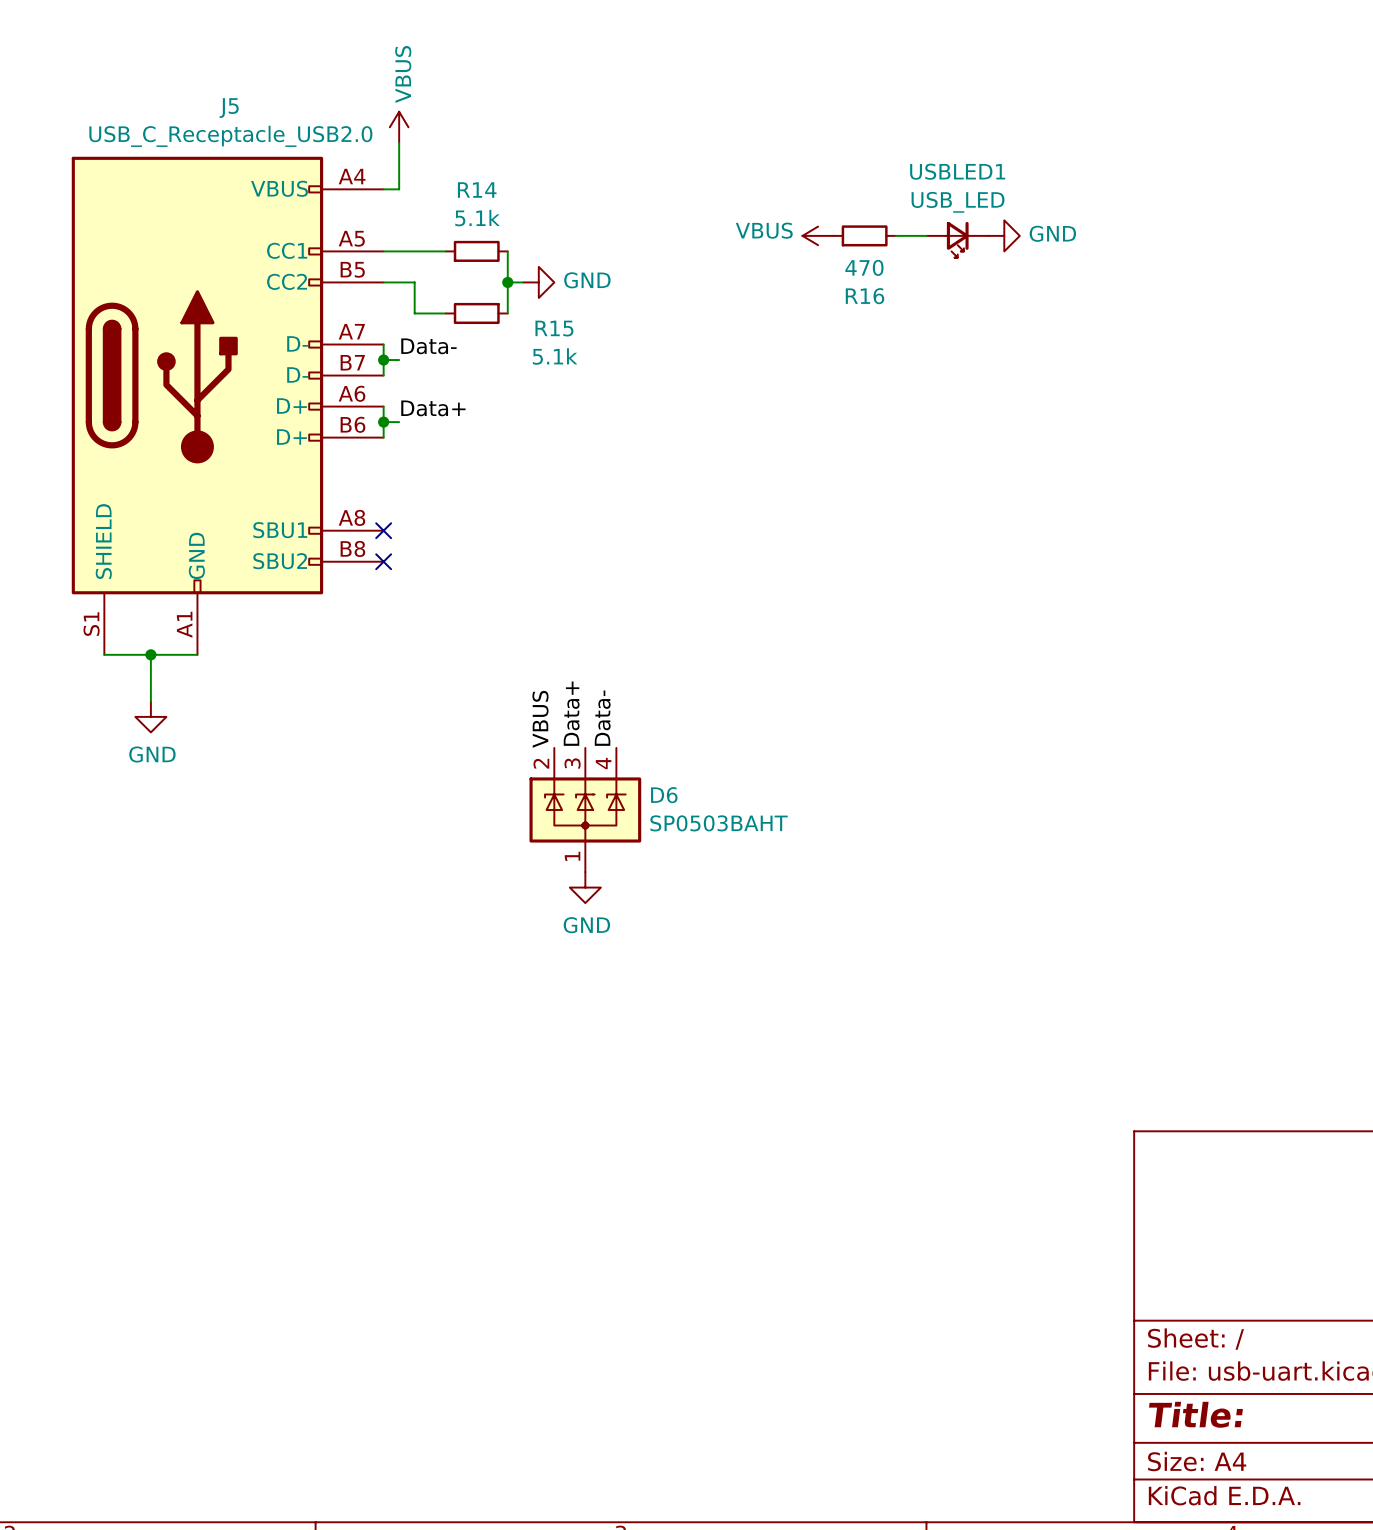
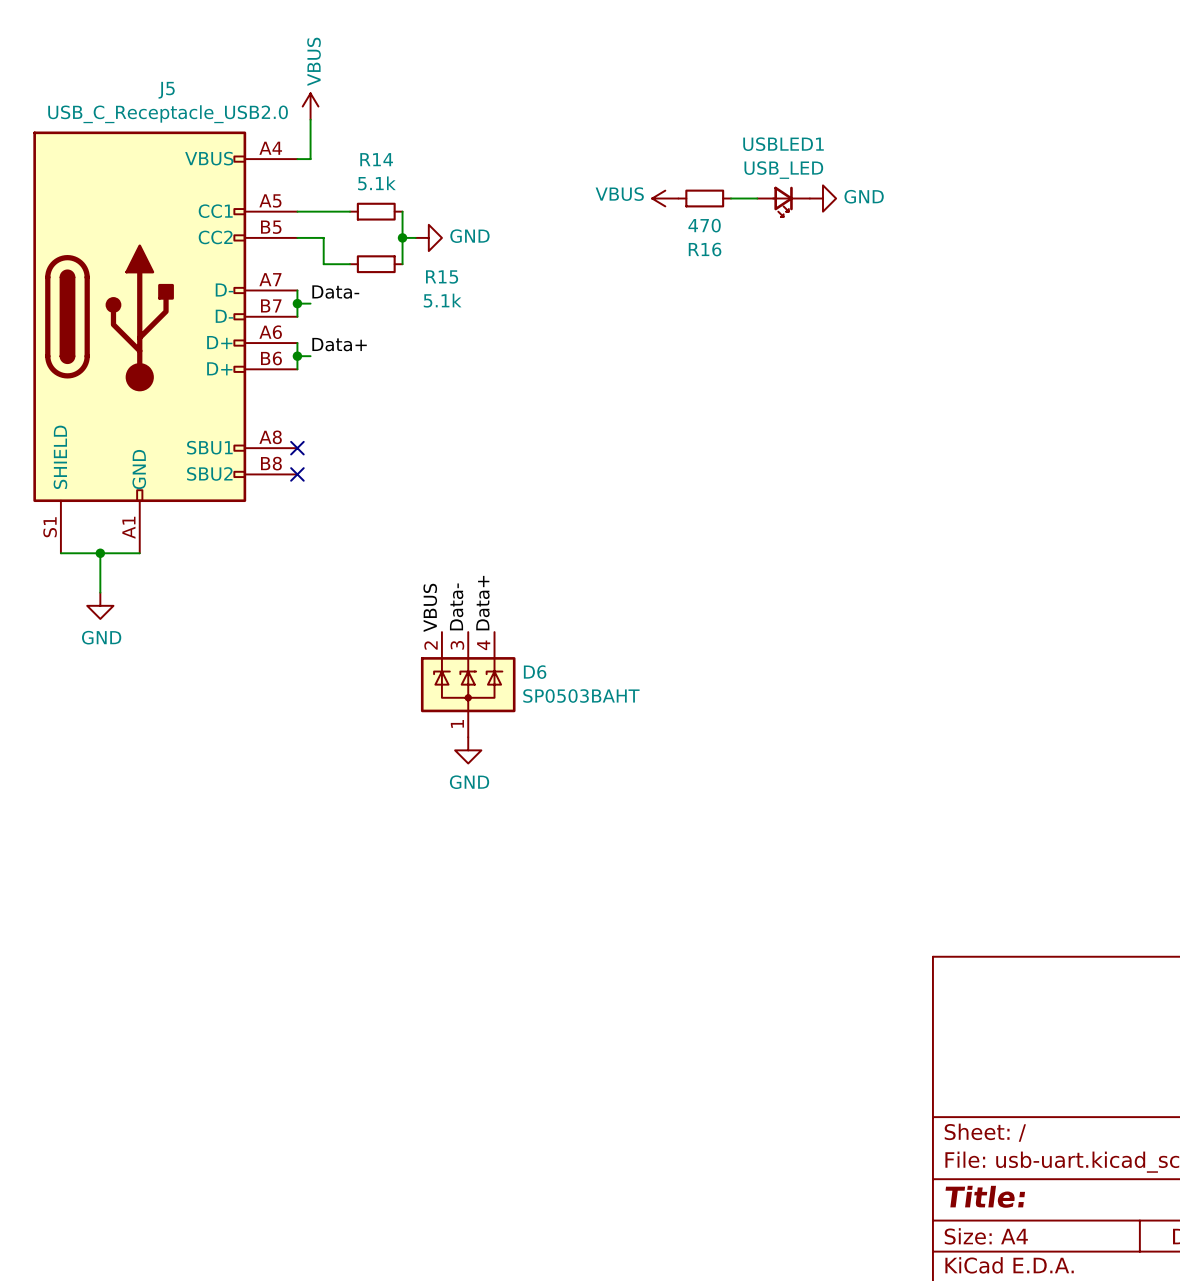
label: Data+ (571, 713) -> Data- (456, 606)
label: Data- (602, 718) -> Data+ (482, 603)

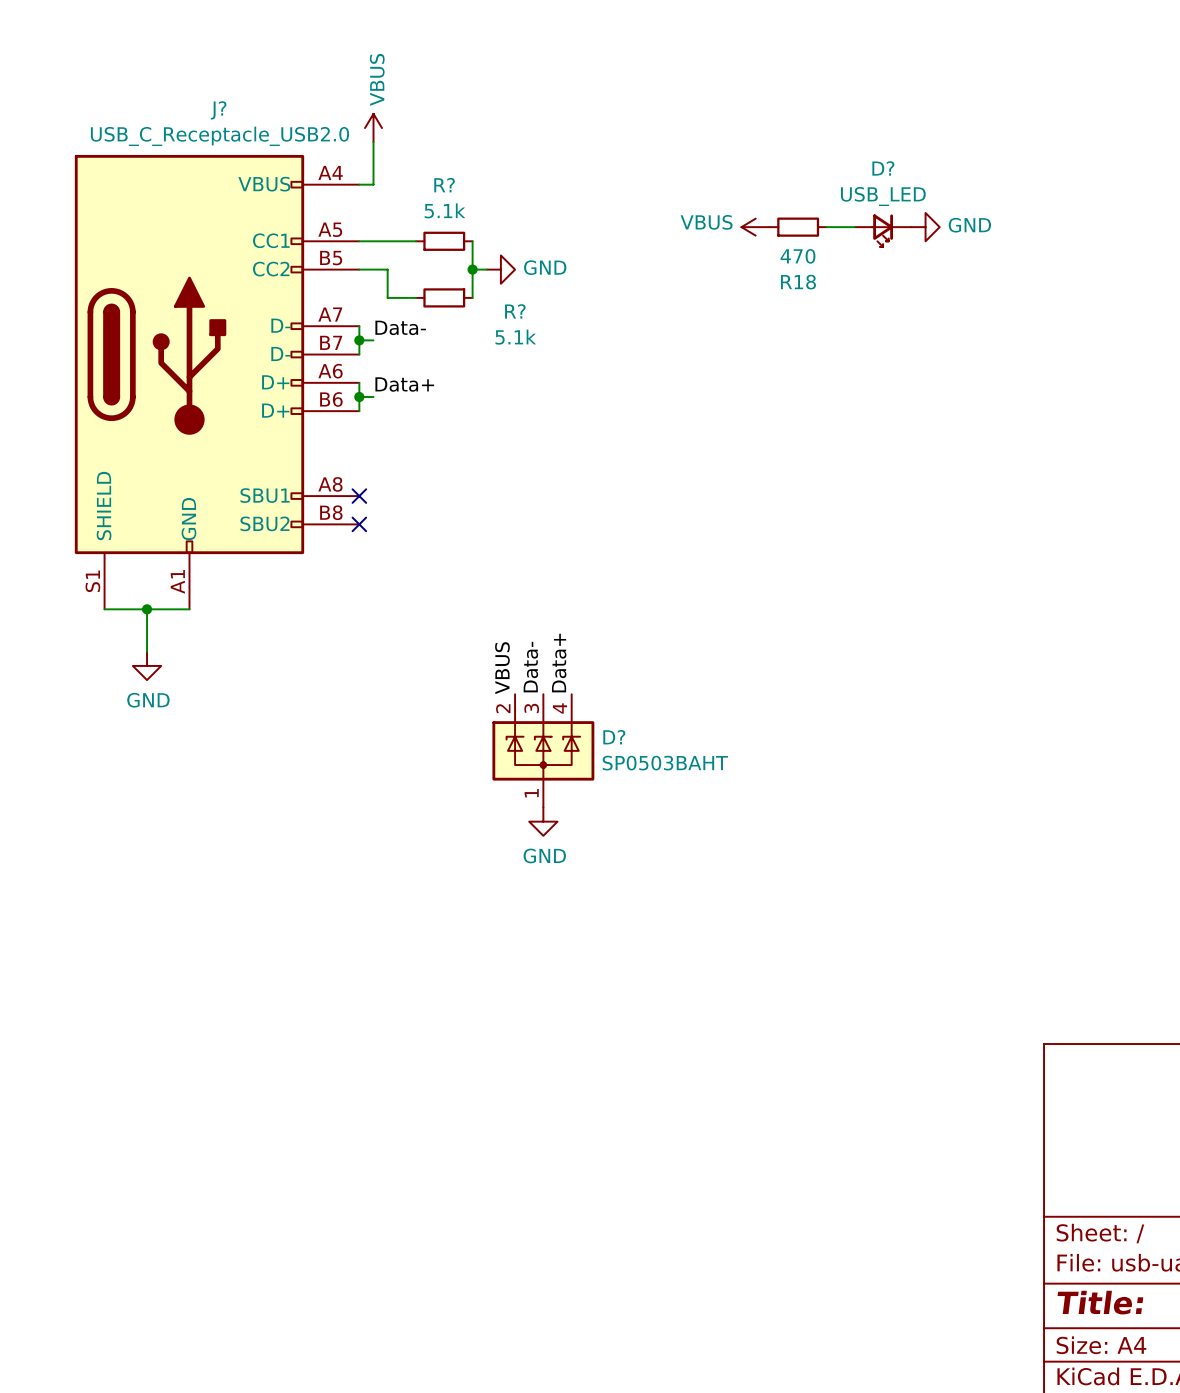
J5 name: J5 (166, 90) -> J? (218, 110)
USBLED1 name: USBLED1 (783, 144) -> D? (883, 168)
R14 name: R14 (376, 159) -> R? (444, 185)
R16 name: R16 (705, 249) -> R18 (798, 282)
R15 name: R15 (442, 276) -> R? (515, 311)
D6 name: D6 (535, 672) -> D? (614, 737)

